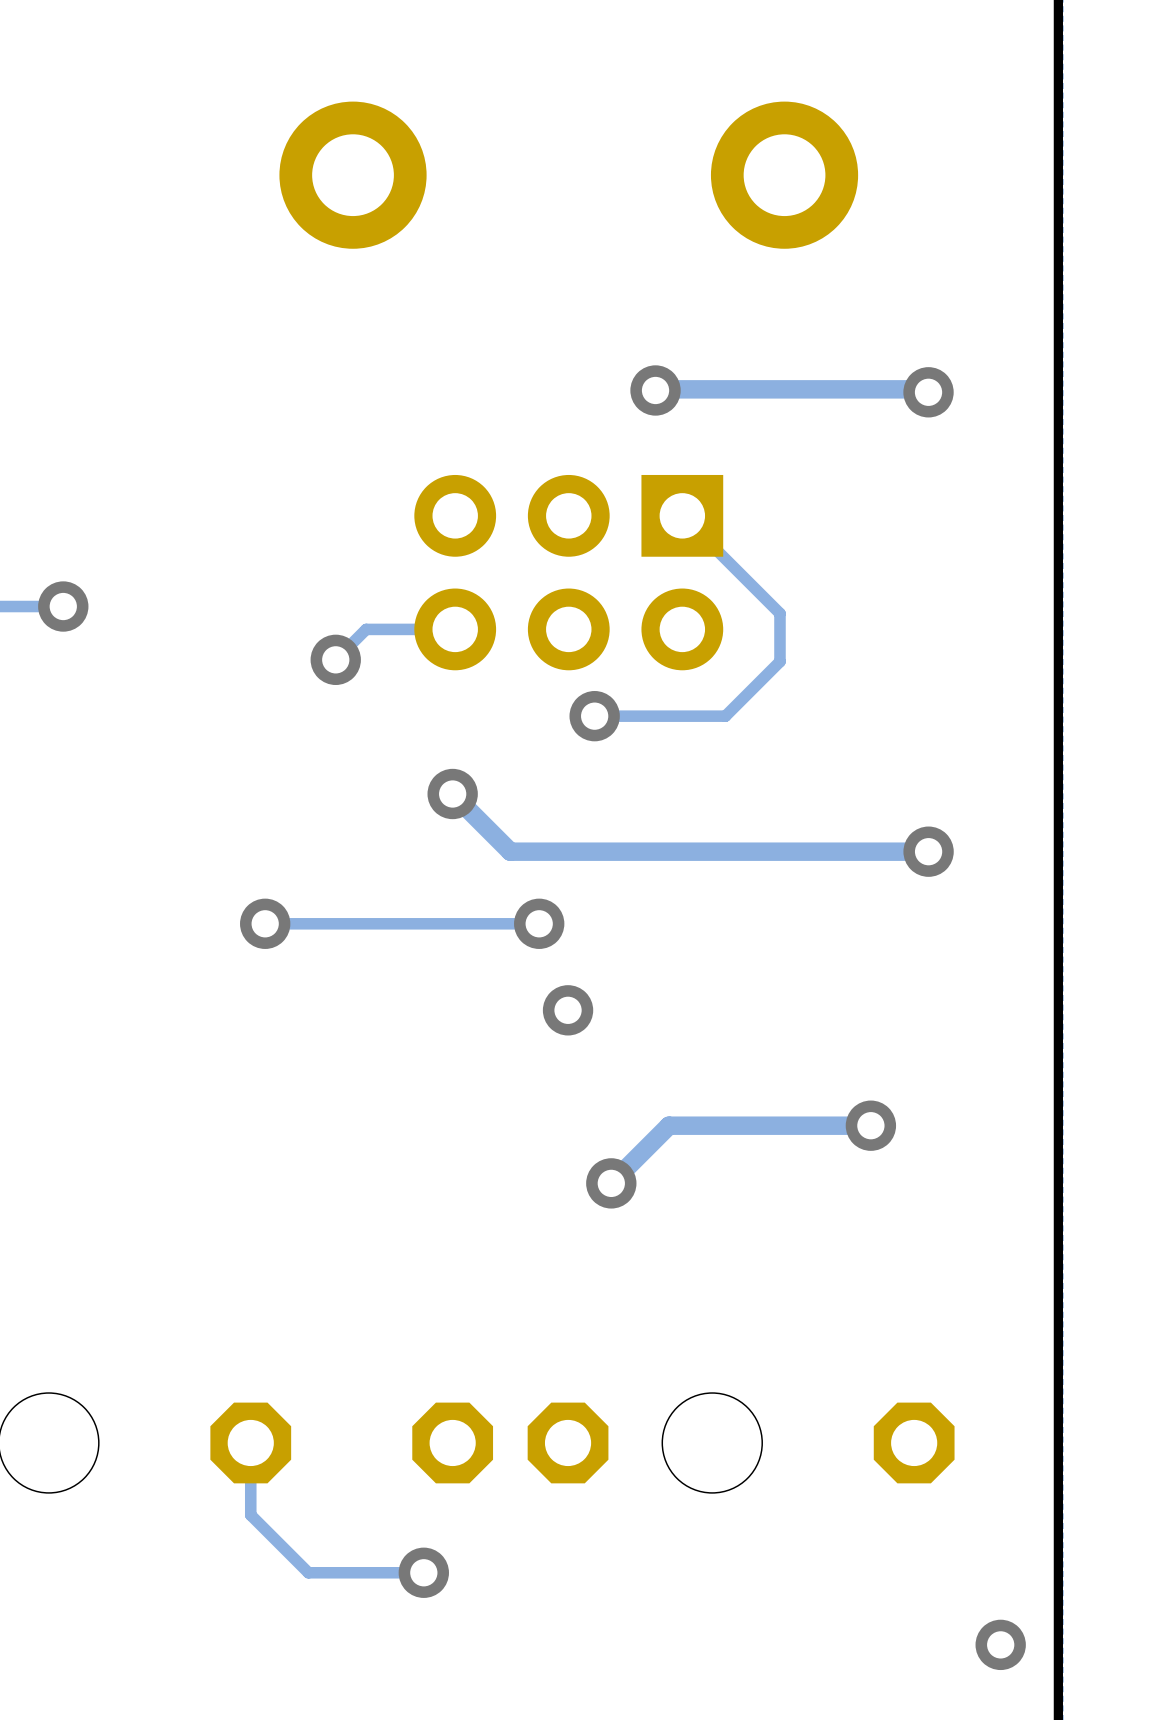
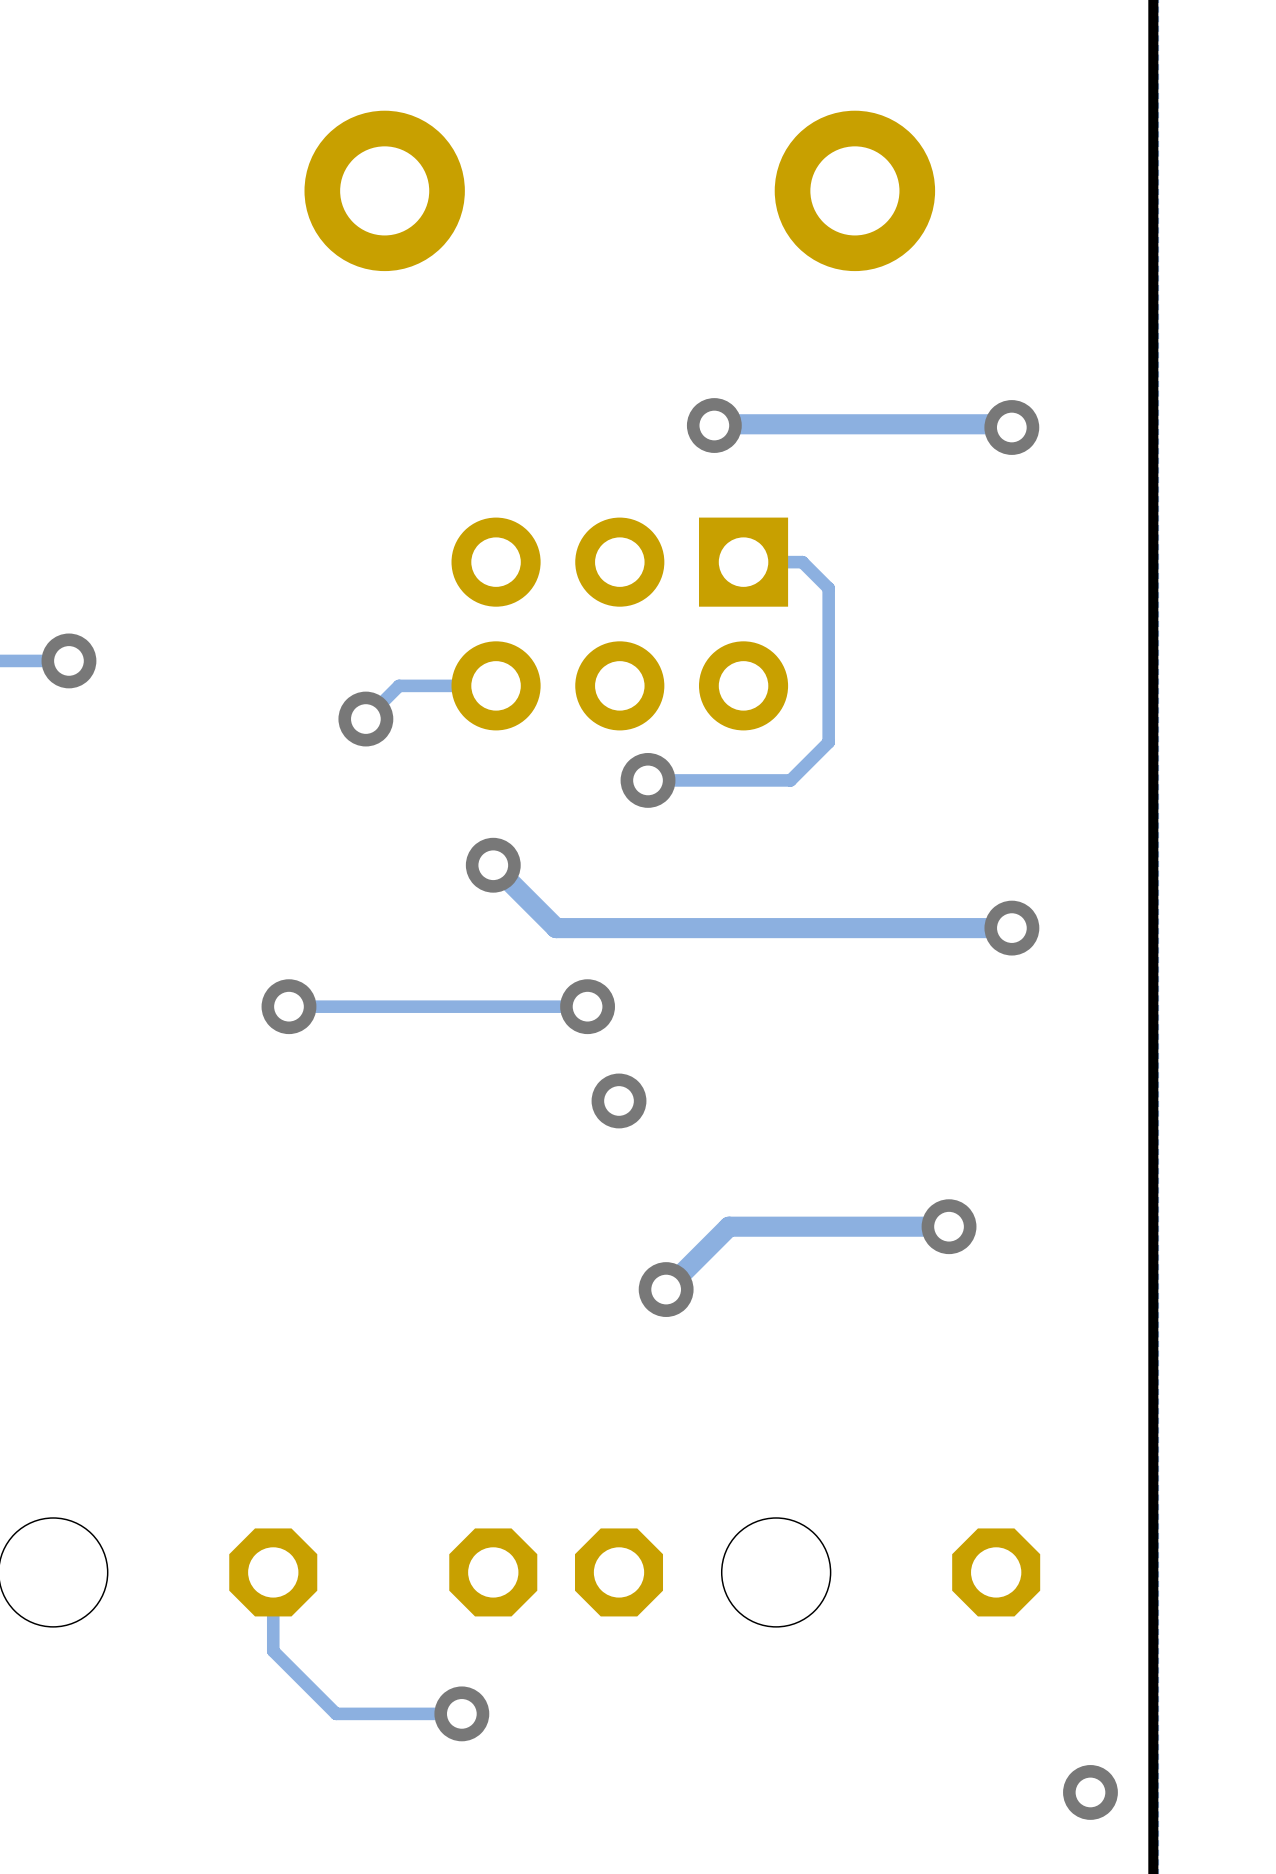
track: (682, 515) (779, 613) (779, 661) (760, 681) -> (743, 562) (802, 562) (828, 588) (828, 742)

